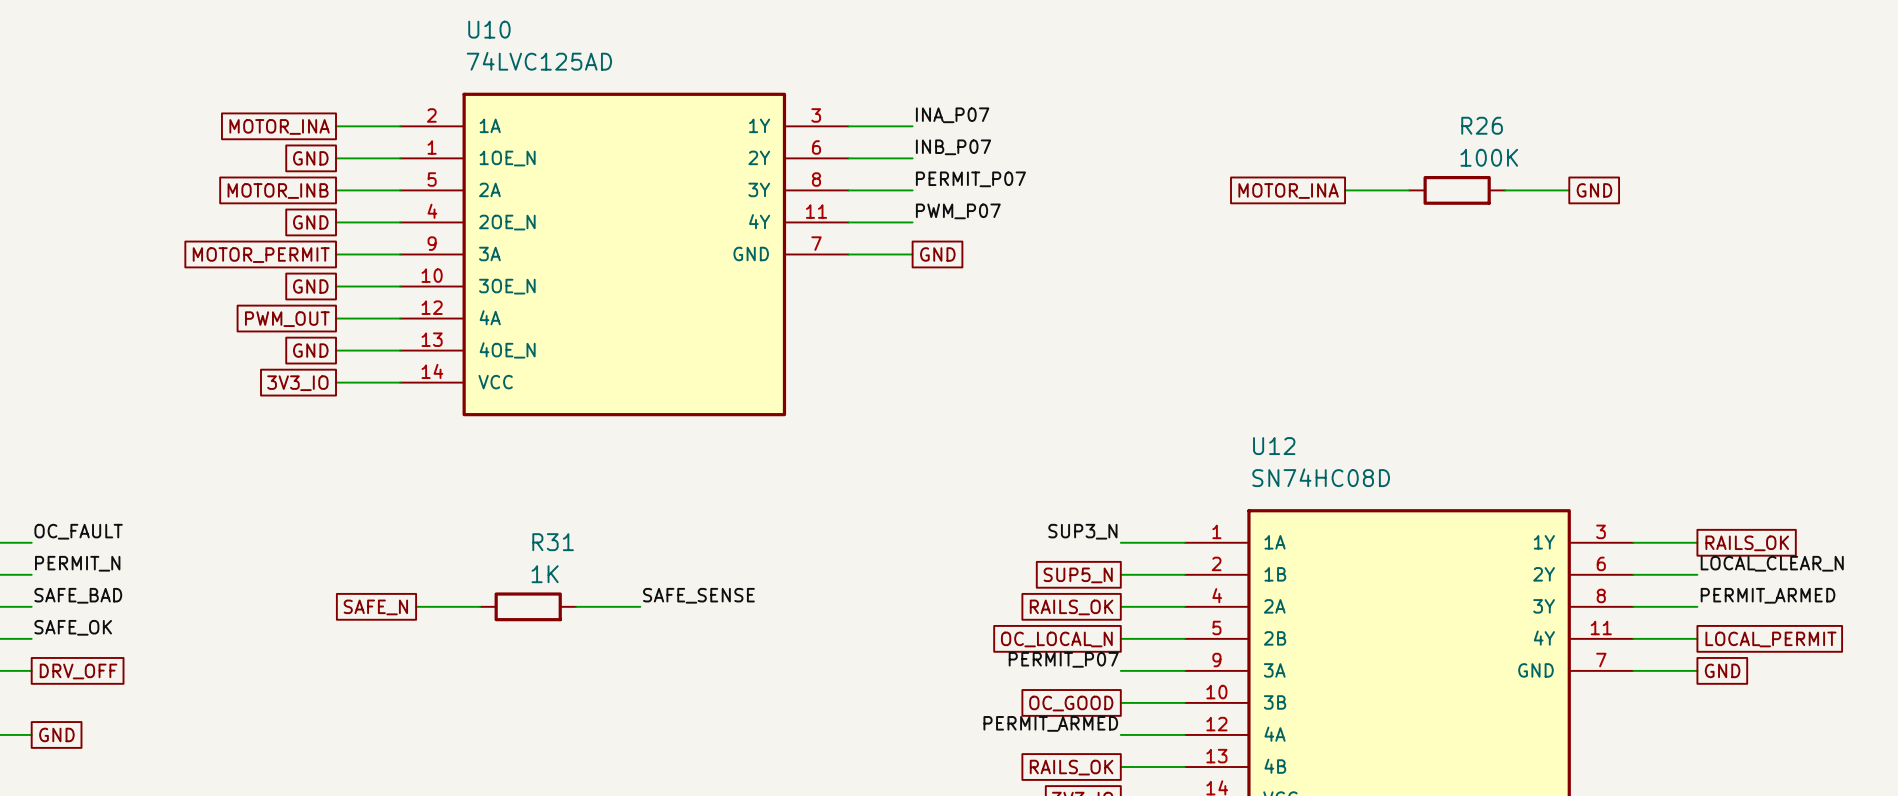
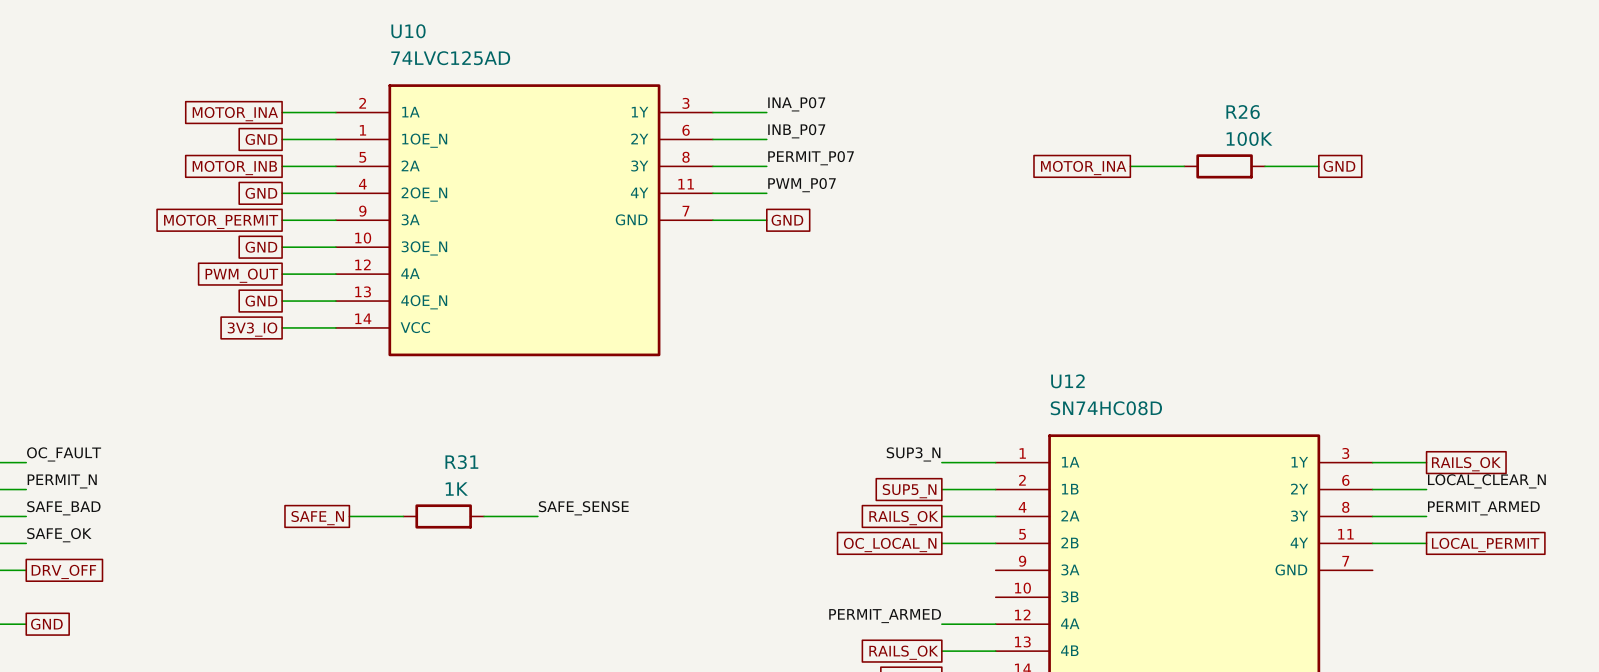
label: PERMIT_P07 (1063, 659) -> none
wire: (1120, 670) (1184, 670) -> none
wire: (1633, 670) (1697, 670) -> none
global label: GND (1722, 670) -> none
wire: (1120, 702) (1184, 702) -> none
global label: OC_GOOD (1071, 703) -> none

